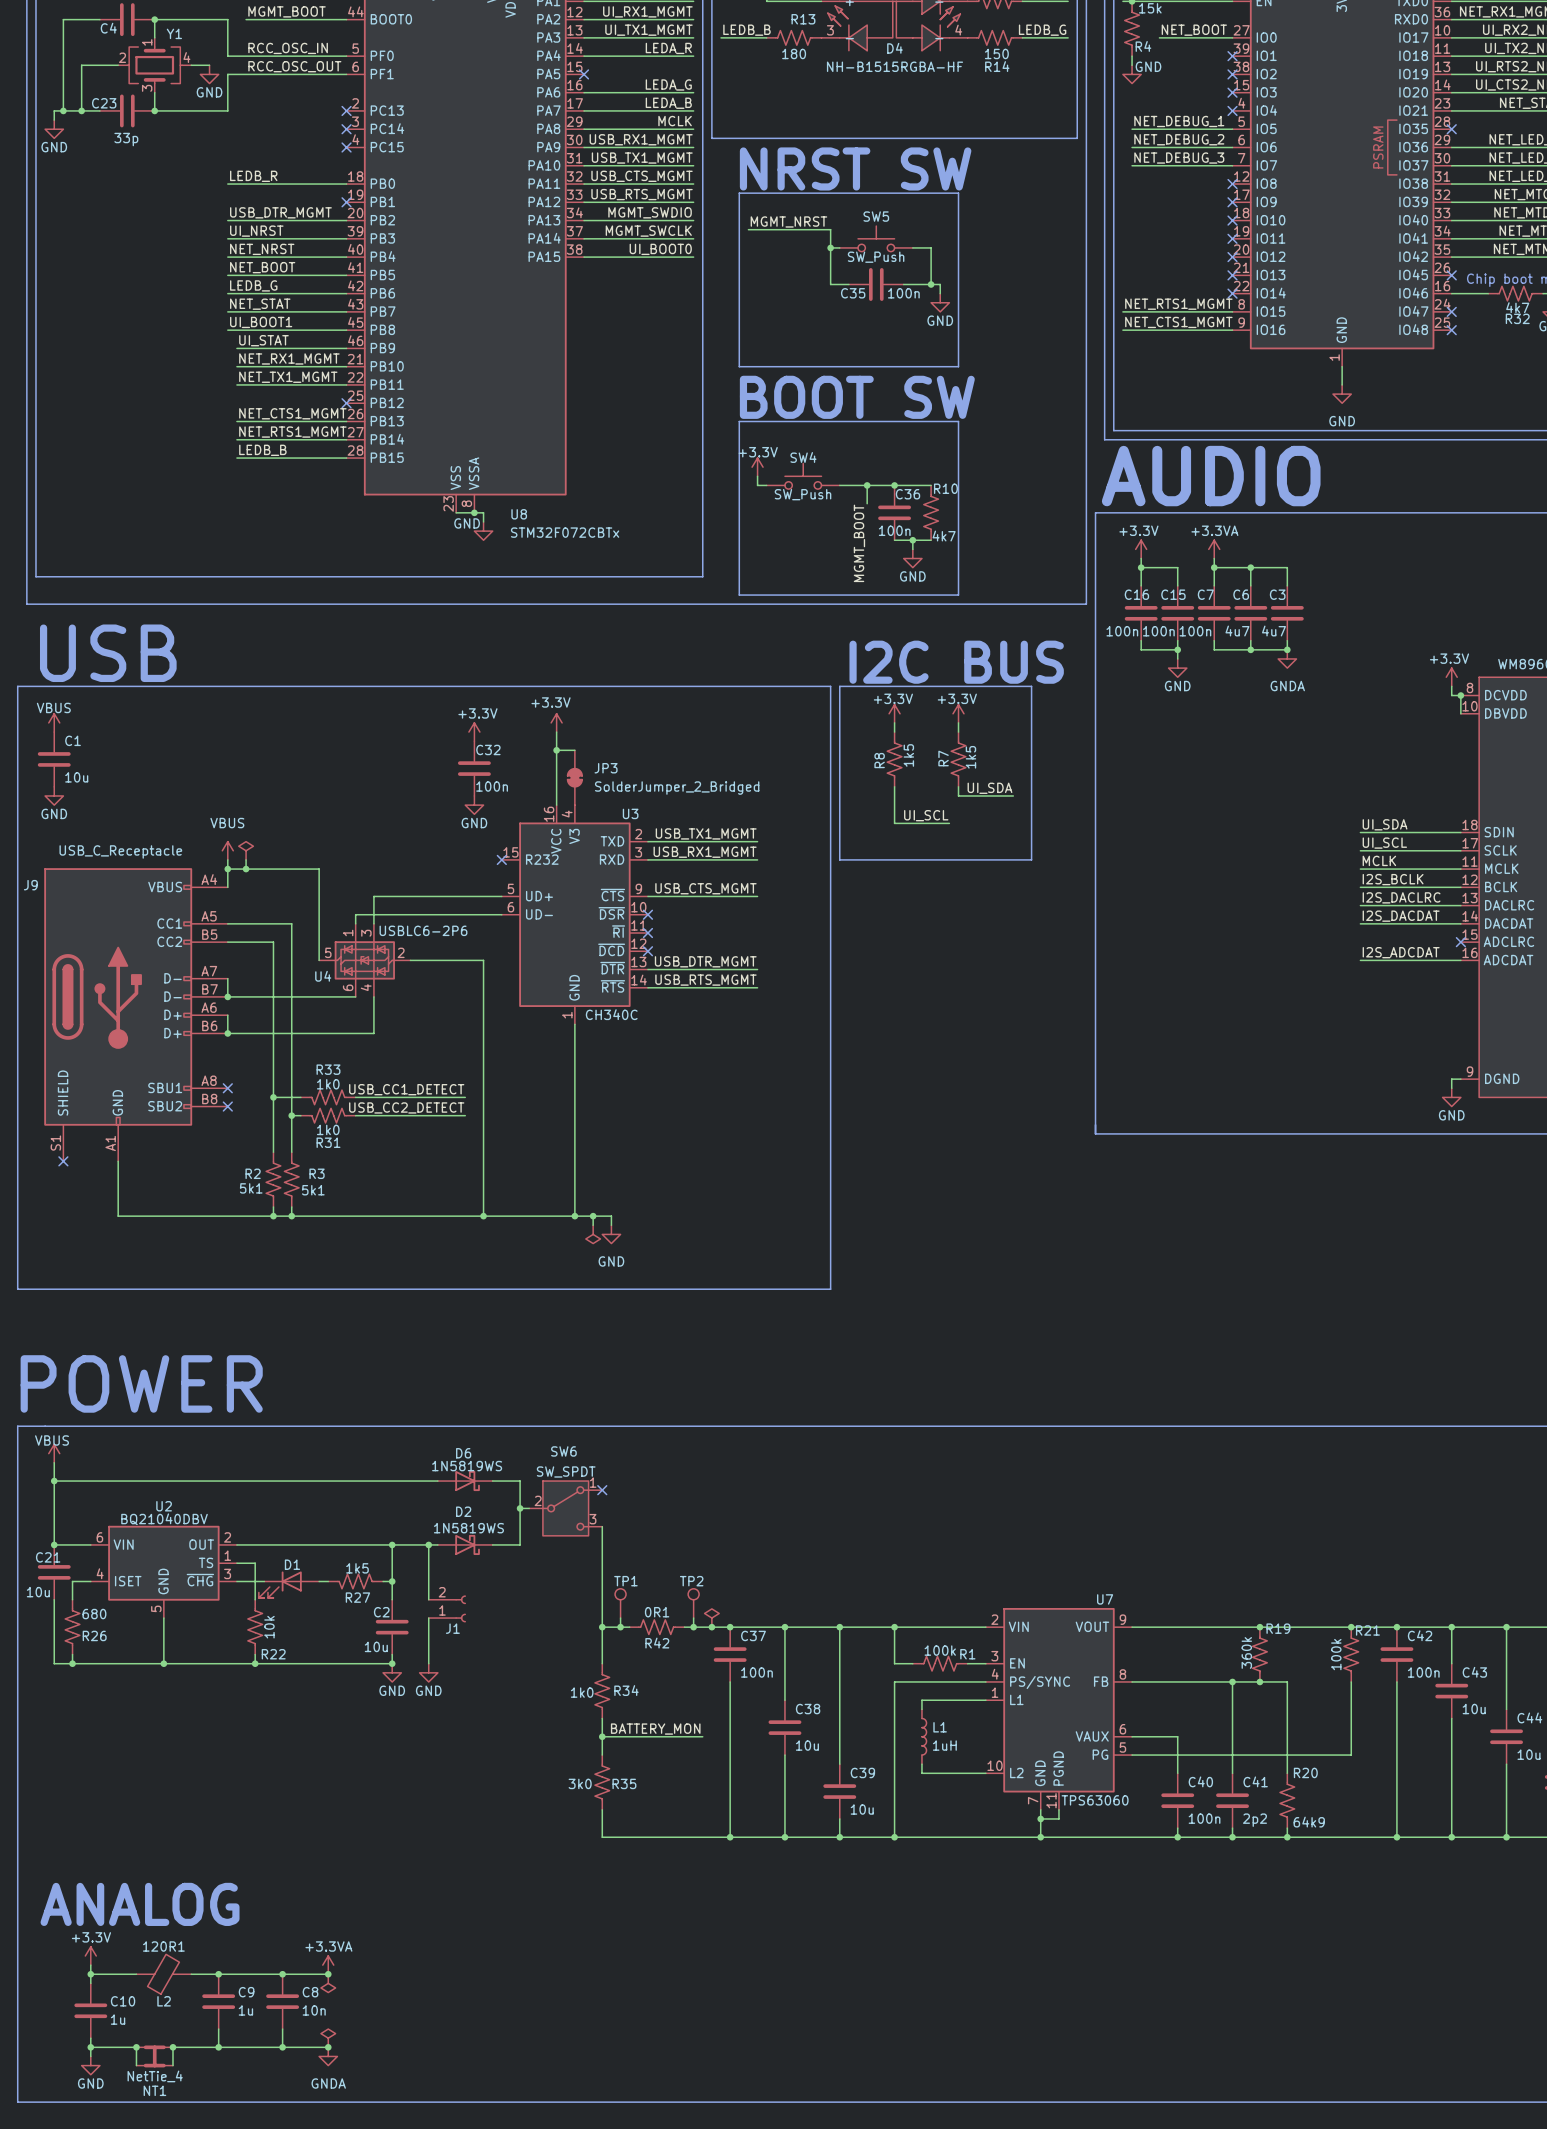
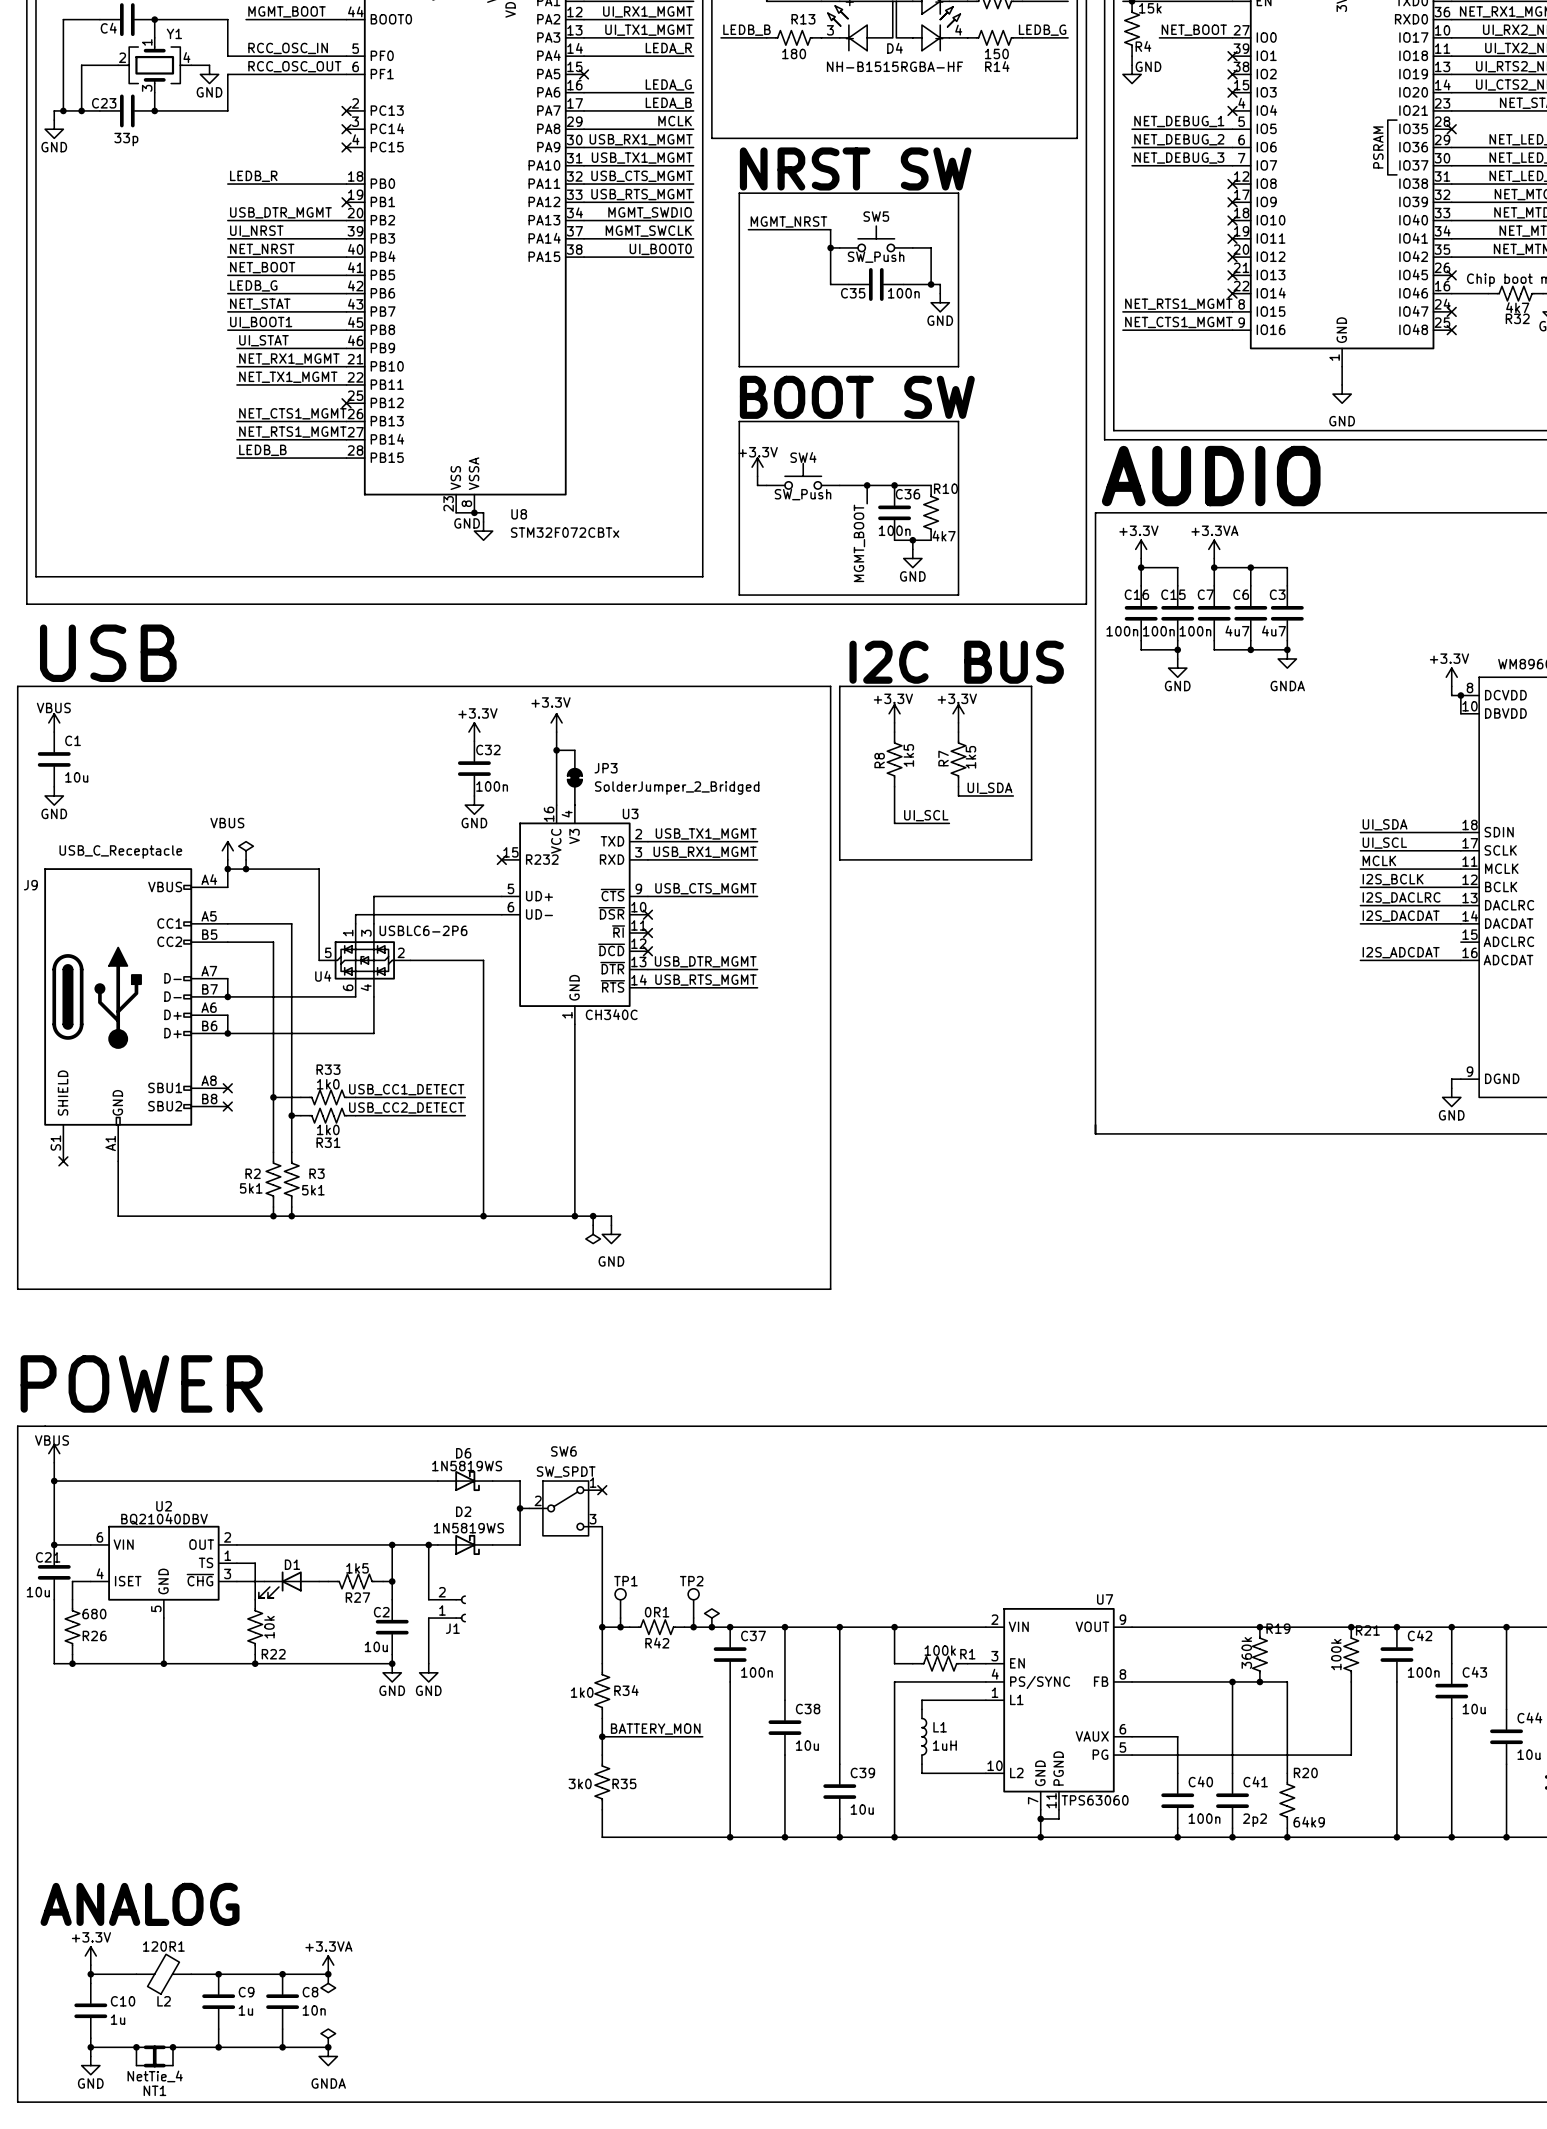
no-connect mark: (1460, 942) -> none

